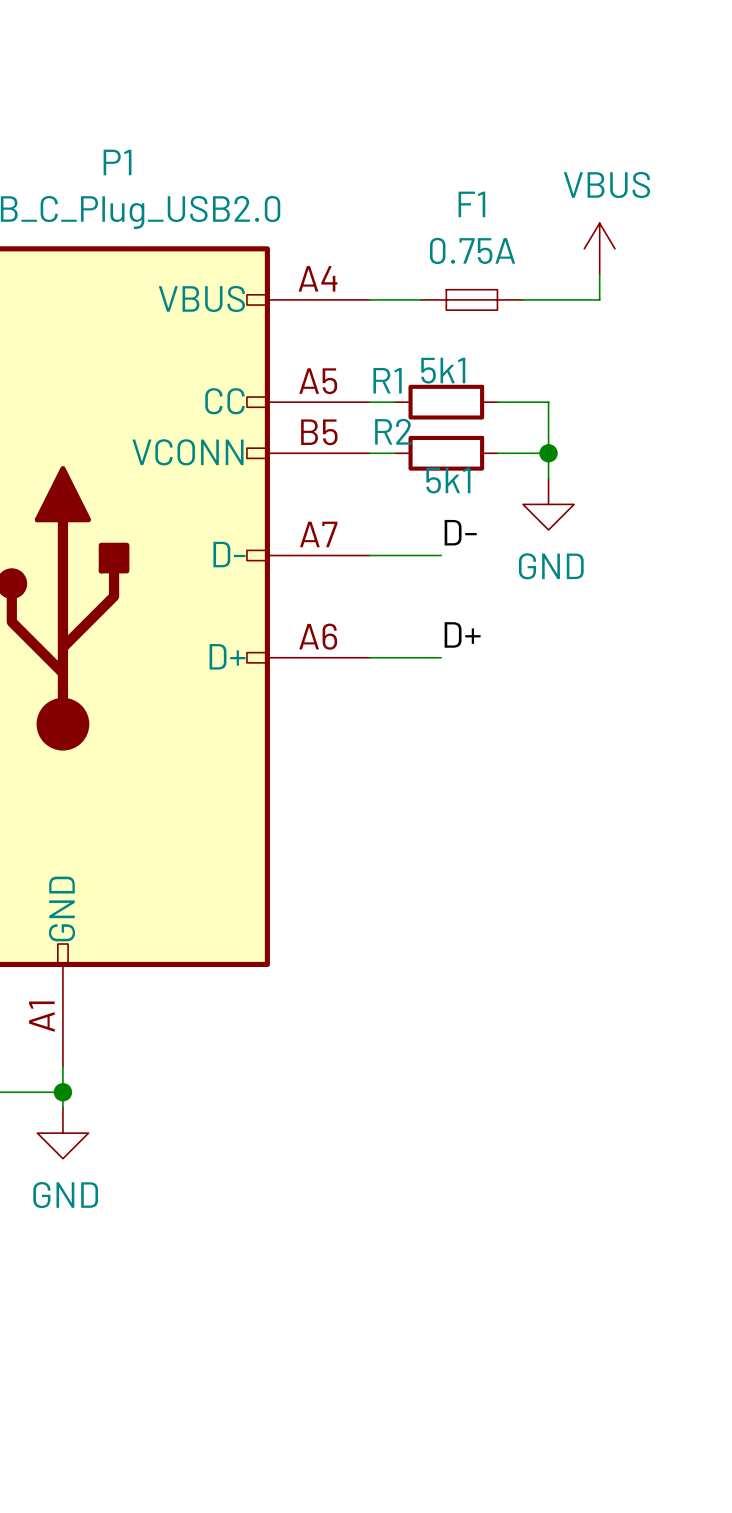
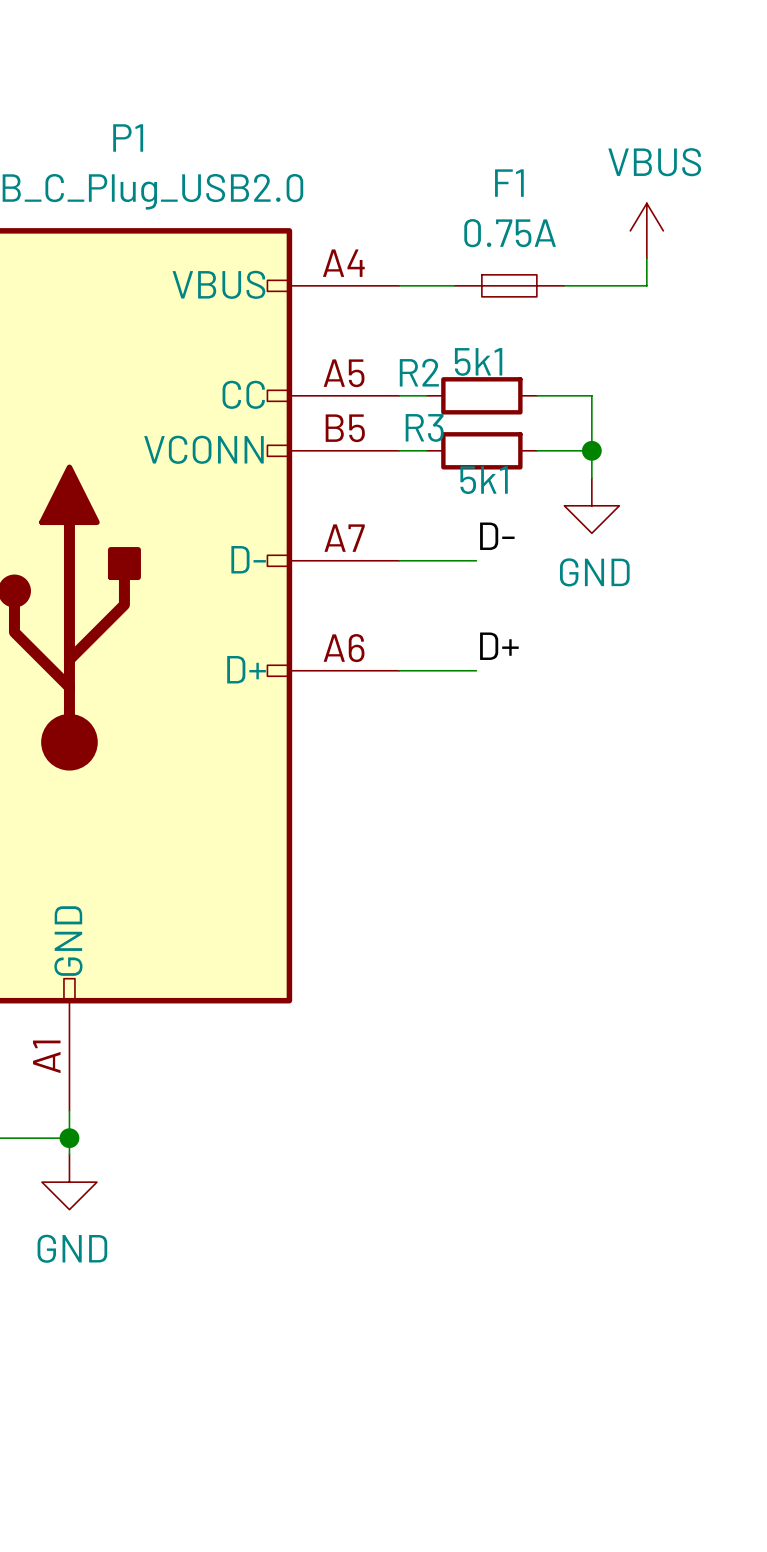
R1 name: R1 (387, 380) -> R2 (419, 372)
R2 name: R2 (393, 431) -> R3 (424, 427)

